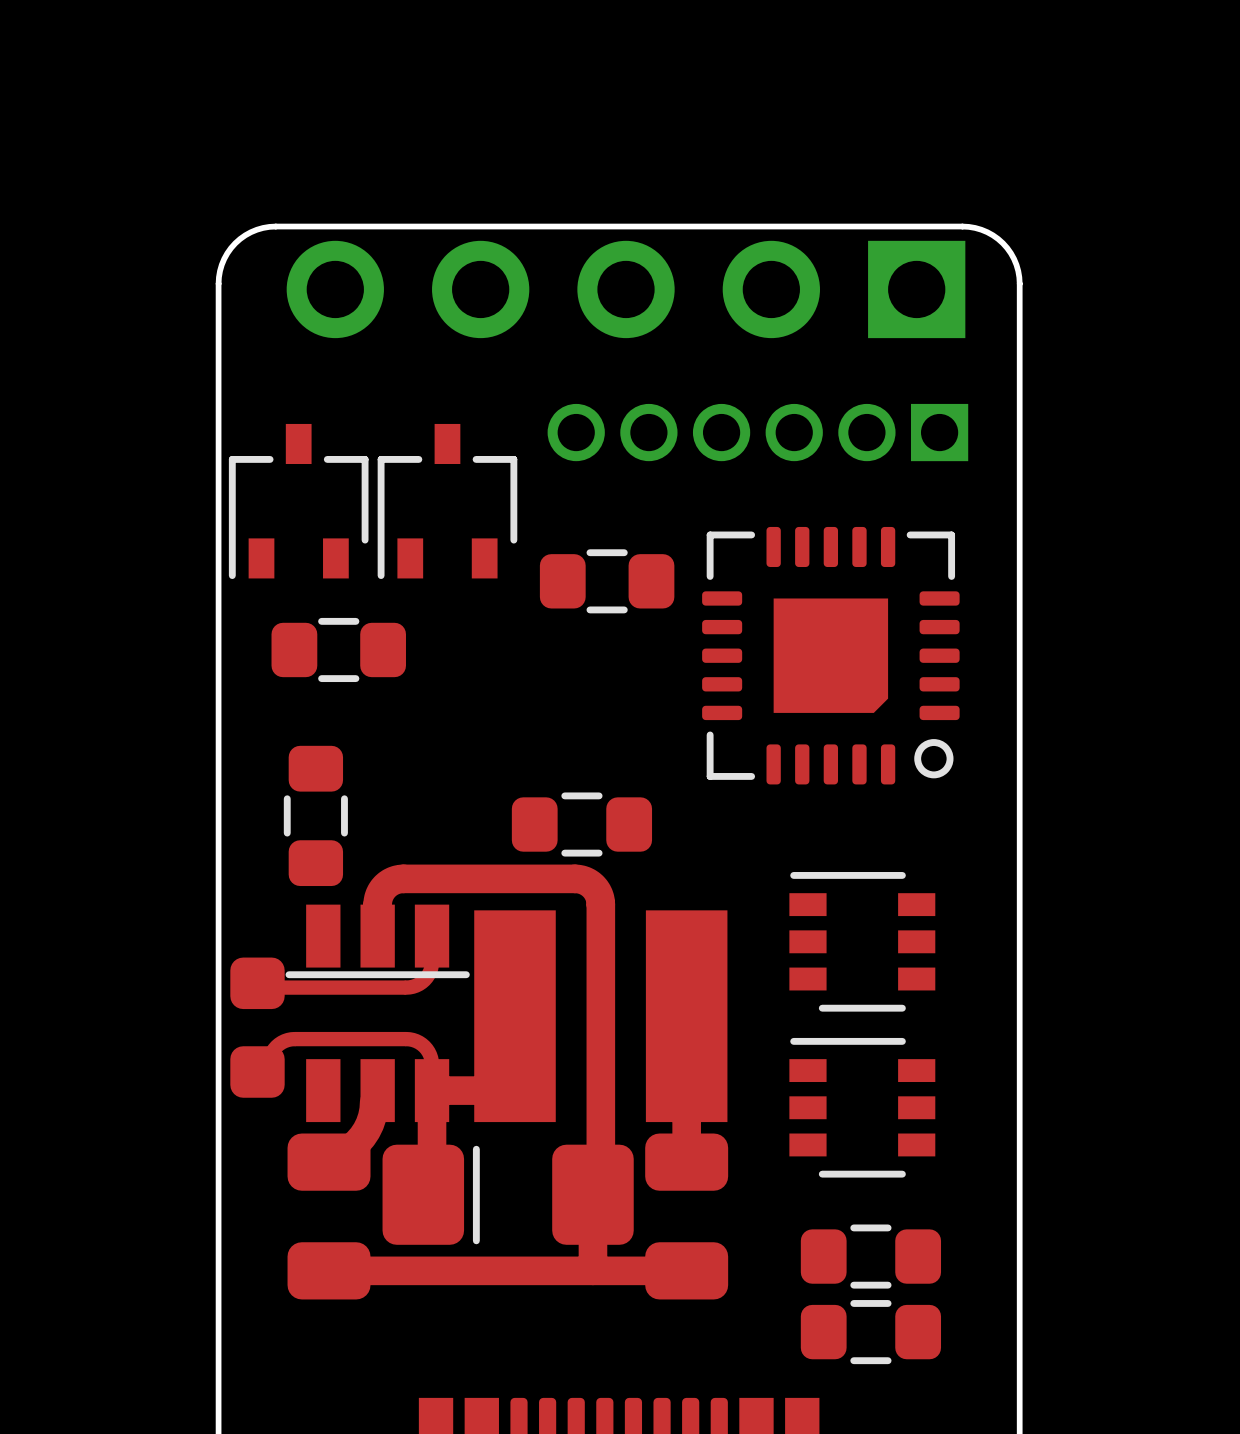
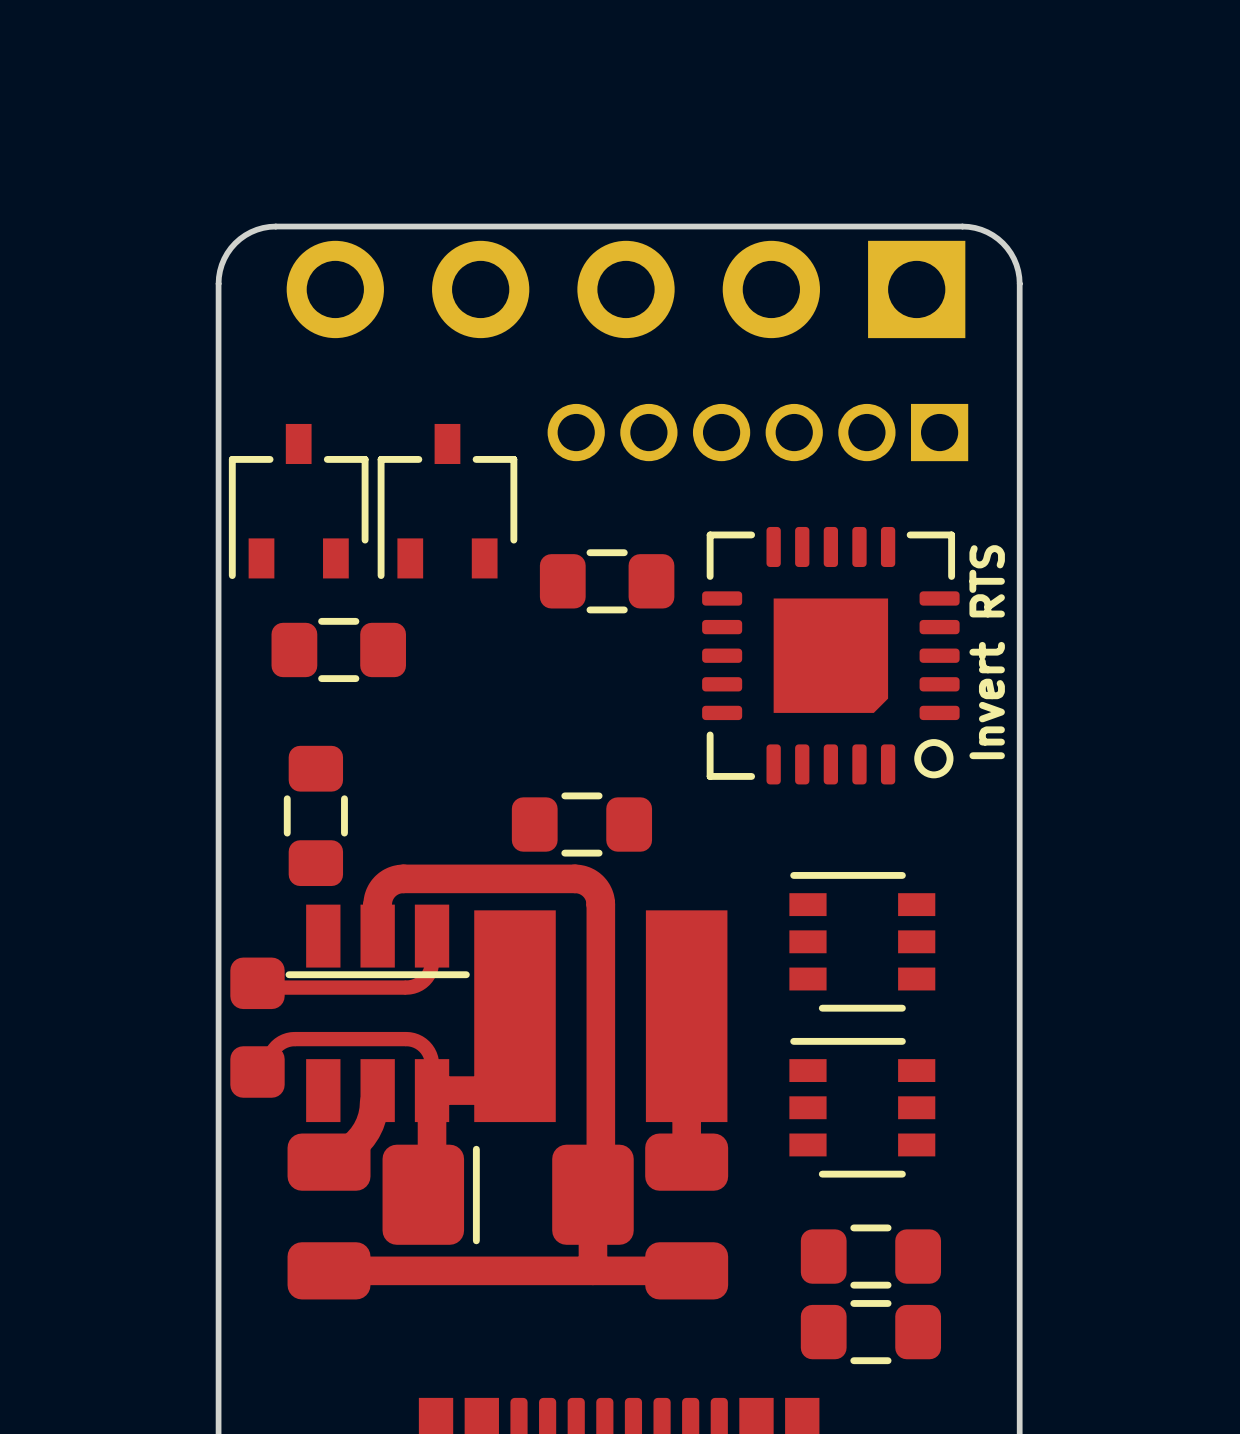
text: none -> Invert RTS (987, 652)

